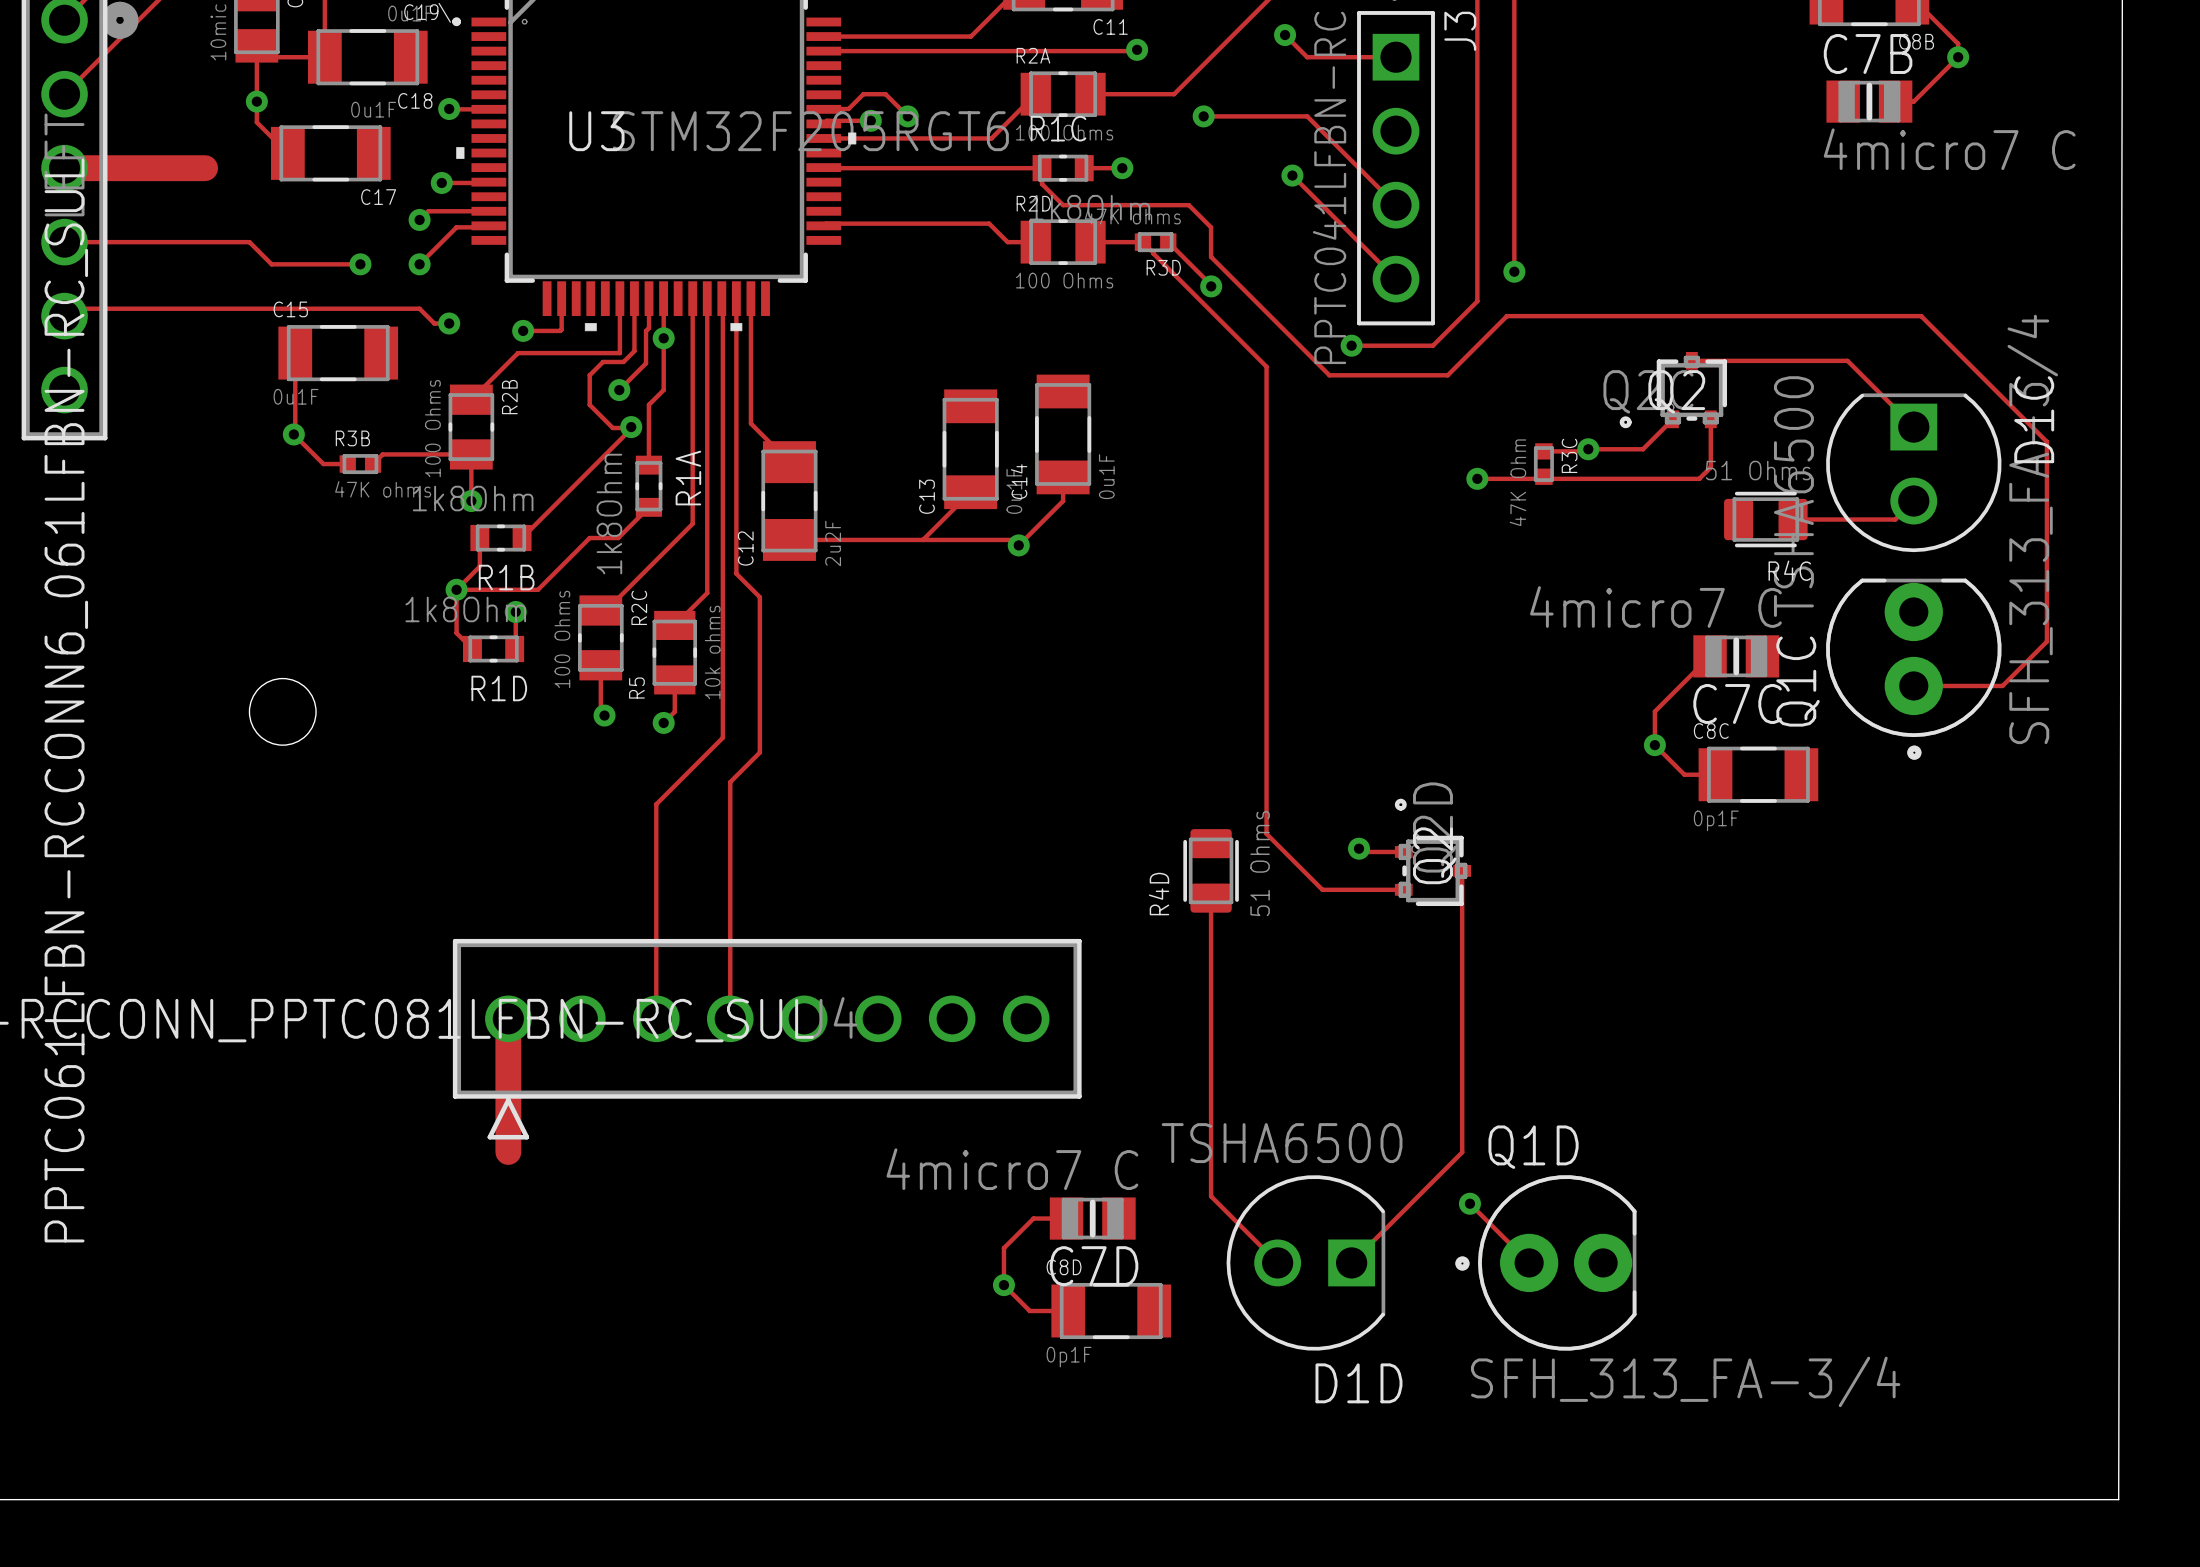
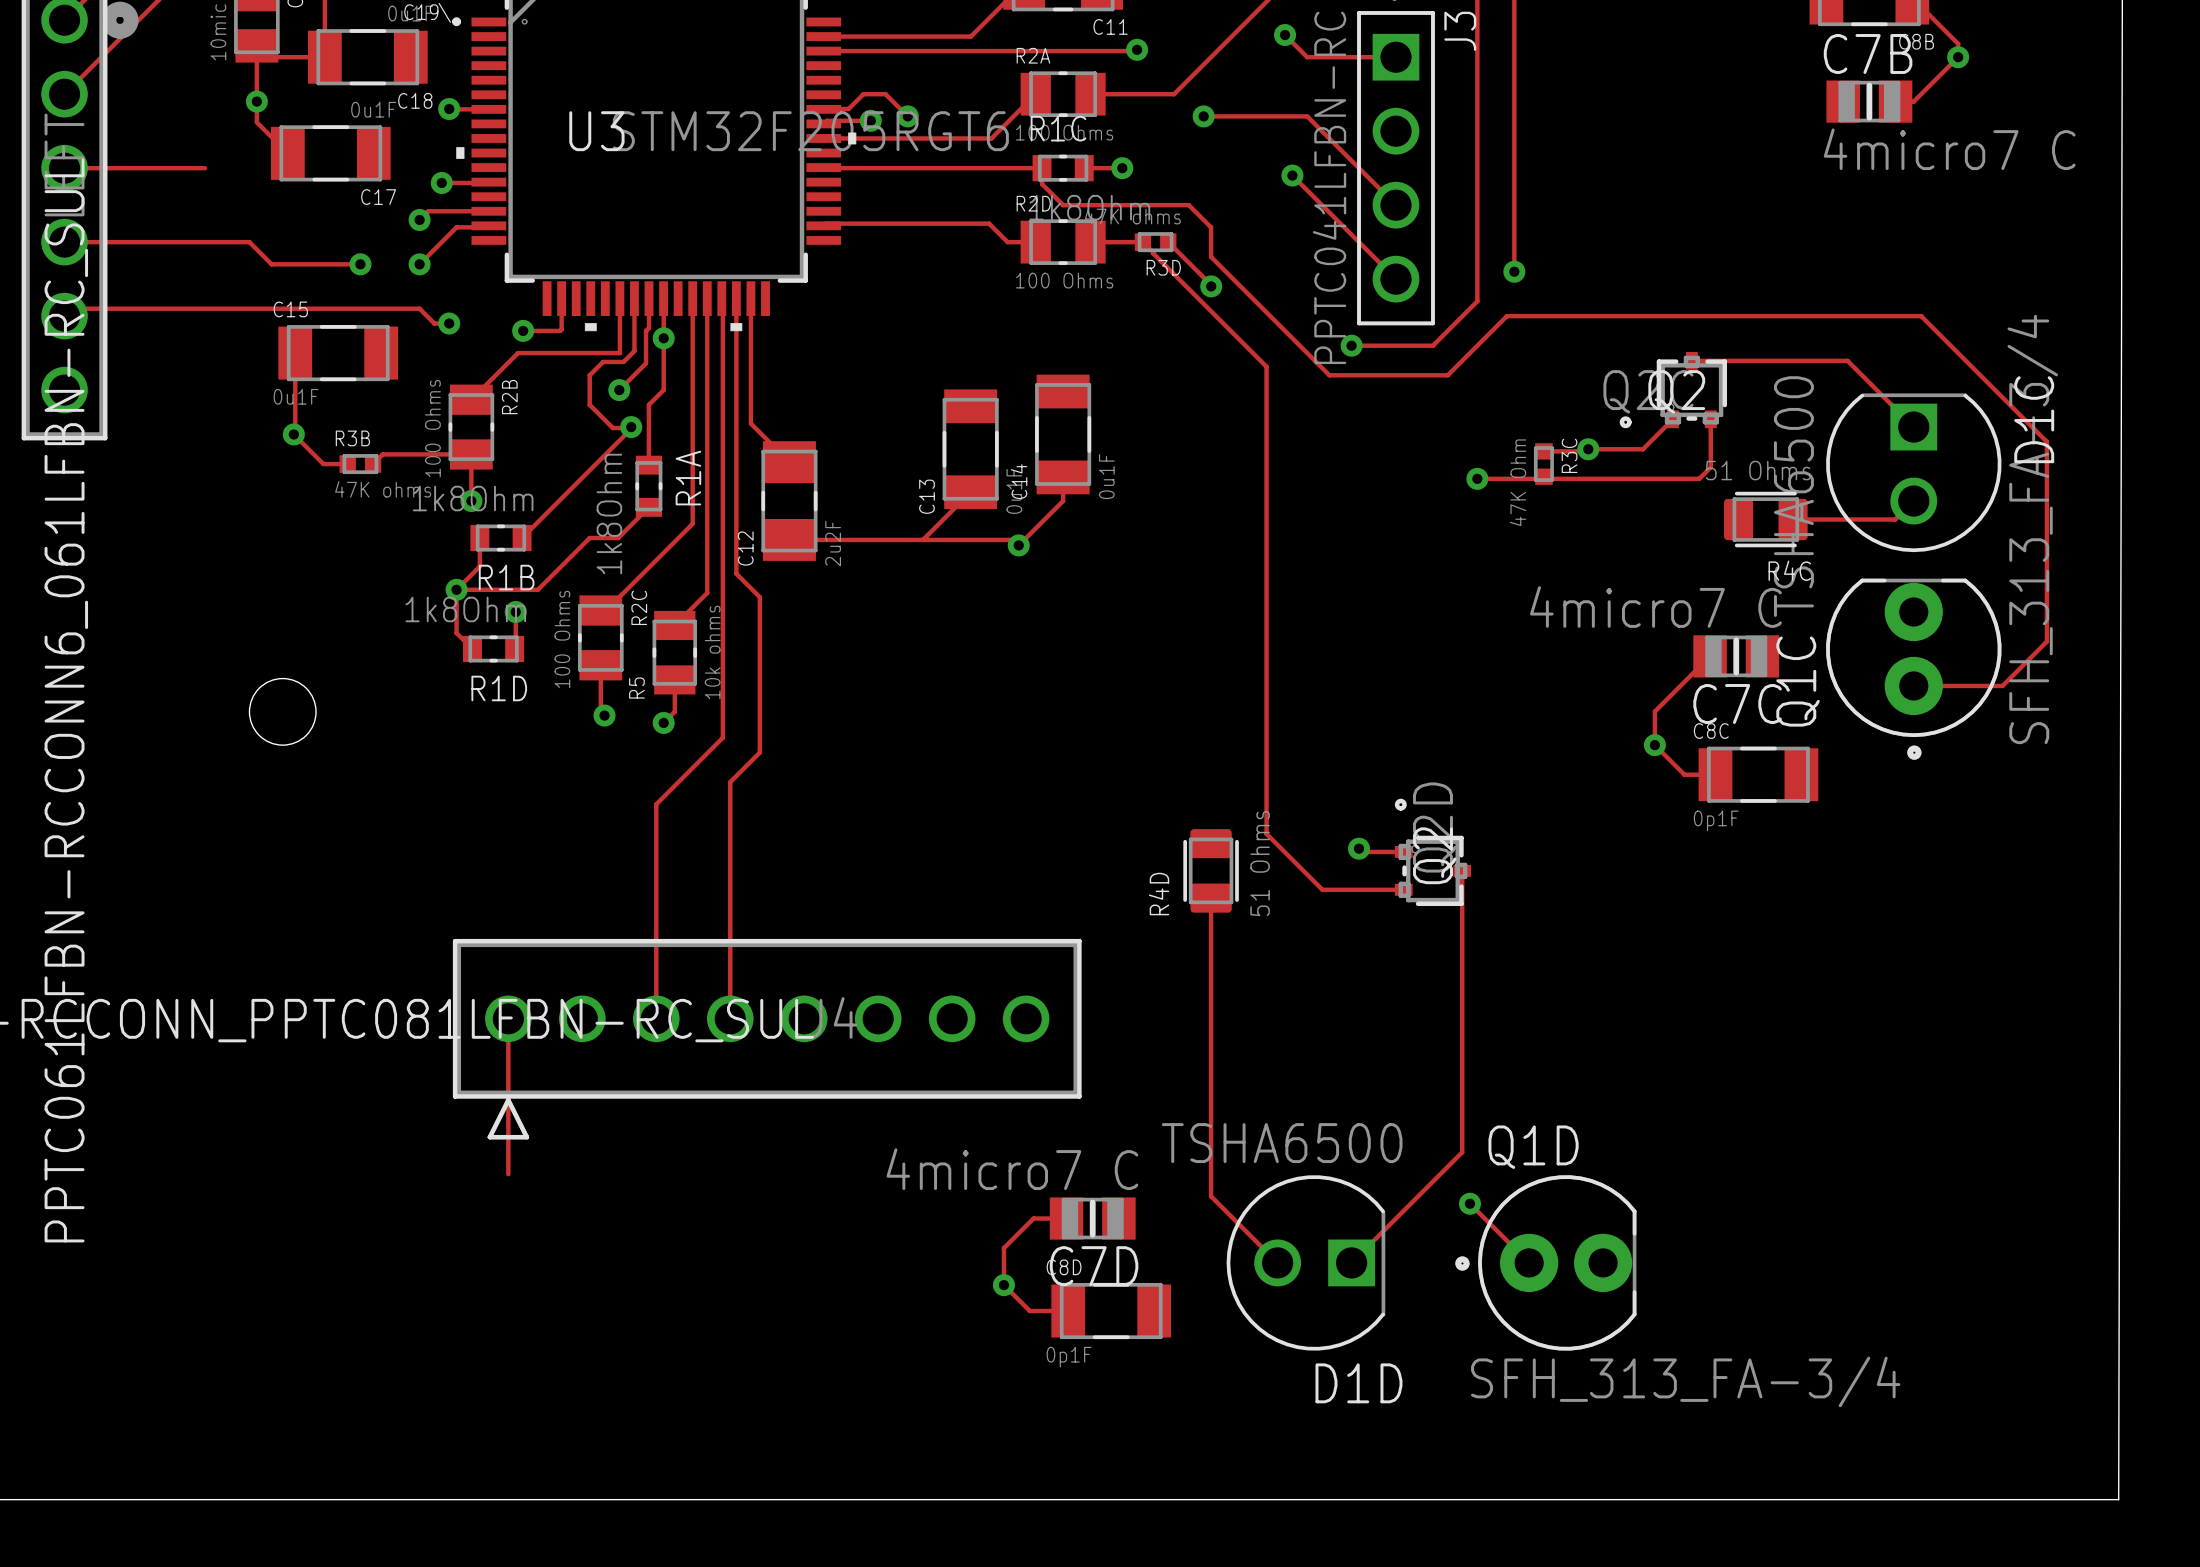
track width: thick (64, 168) (205, 168) -> thin (64, 168) (205, 168)
track width: thick (508, 1018) (508, 1151) -> thin (508, 1018) (508, 1151)
track: none -> (508, 1151) (508, 1174)

